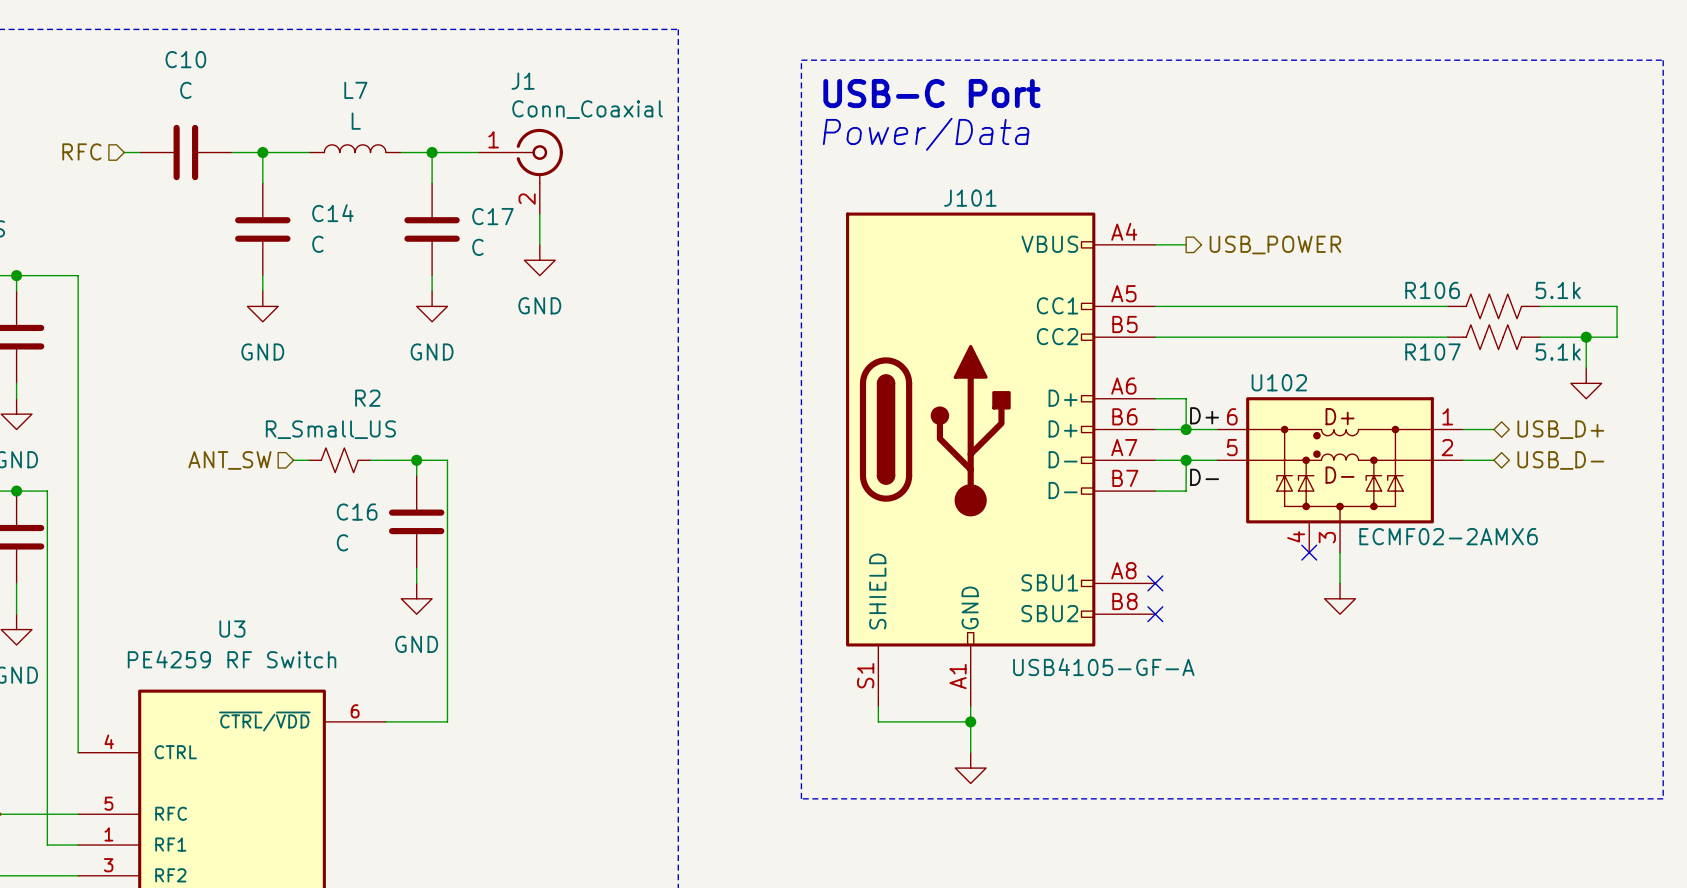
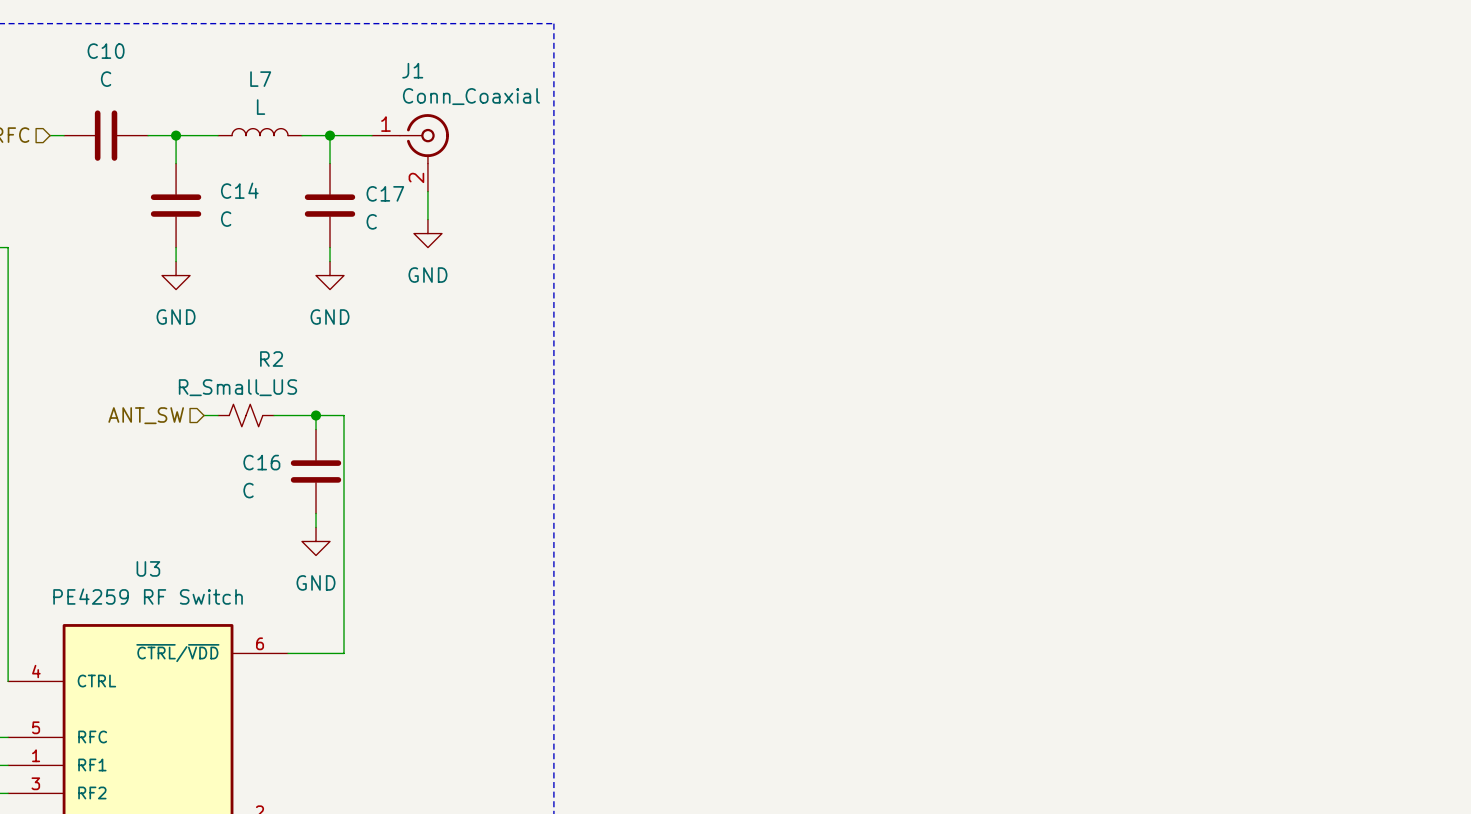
line: (801, 60) (1663, 60) (1663, 798) (801, 798) (801, 60) -> none
text: USB-C Port (931, 93) -> none
text: Power/Data (926, 134) -> none
wire: (1155, 244) (1186, 244) -> none
hierarchical label: USB_POWER (1275, 245) -> none
wire: (1155, 306) (1447, 306) -> none
R106: 5.1k (1493, 306) -> none
wire: (1540, 306) (1617, 306) (1617, 337) (1540, 337) -> none
wire: (1155, 337) (1447, 337) -> none
R107: 5.1k (1493, 337) -> none
wire: (1586, 337) (1586, 367) -> none
junction: (1586, 337) -> none
power symbol: (1586, 383) -> none
wire: (1155, 398) (1186, 398) (1186, 429) -> none
label: D+ (1204, 415) -> none
wire: (1155, 429) (1216, 429) -> none
junction: (1186, 429) -> none
wire: (1463, 429) (1493, 429) -> none
hierarchical label: USB_D+ (1560, 429) -> none
J101: USB4105-GF-A (1000, 459) -> none
wire: (1155, 460) (1216, 460) -> none
wire: (1186, 460) (1186, 491) (1155, 491) -> none
junction: (1186, 460) -> none
wire: (1463, 460) (1493, 460) -> none
hierarchical label: USB_D- (1560, 460) -> none
U102: ECMF02-2AMX6 (1340, 474) -> none
label: D- (1204, 477) -> none
no-connect mark: (1309, 552) -> none
wire: (1340, 552) (1340, 583) -> none
no-connect mark: (1155, 583) -> none
power symbol: (1340, 598) -> none
no-connect mark: (1155, 614) -> none
wire: (878, 706) (878, 721) (970, 721) -> none
wire: (970, 706) (970, 752) -> none
junction: (970, 721) -> none
power symbol: (970, 768) -> none

